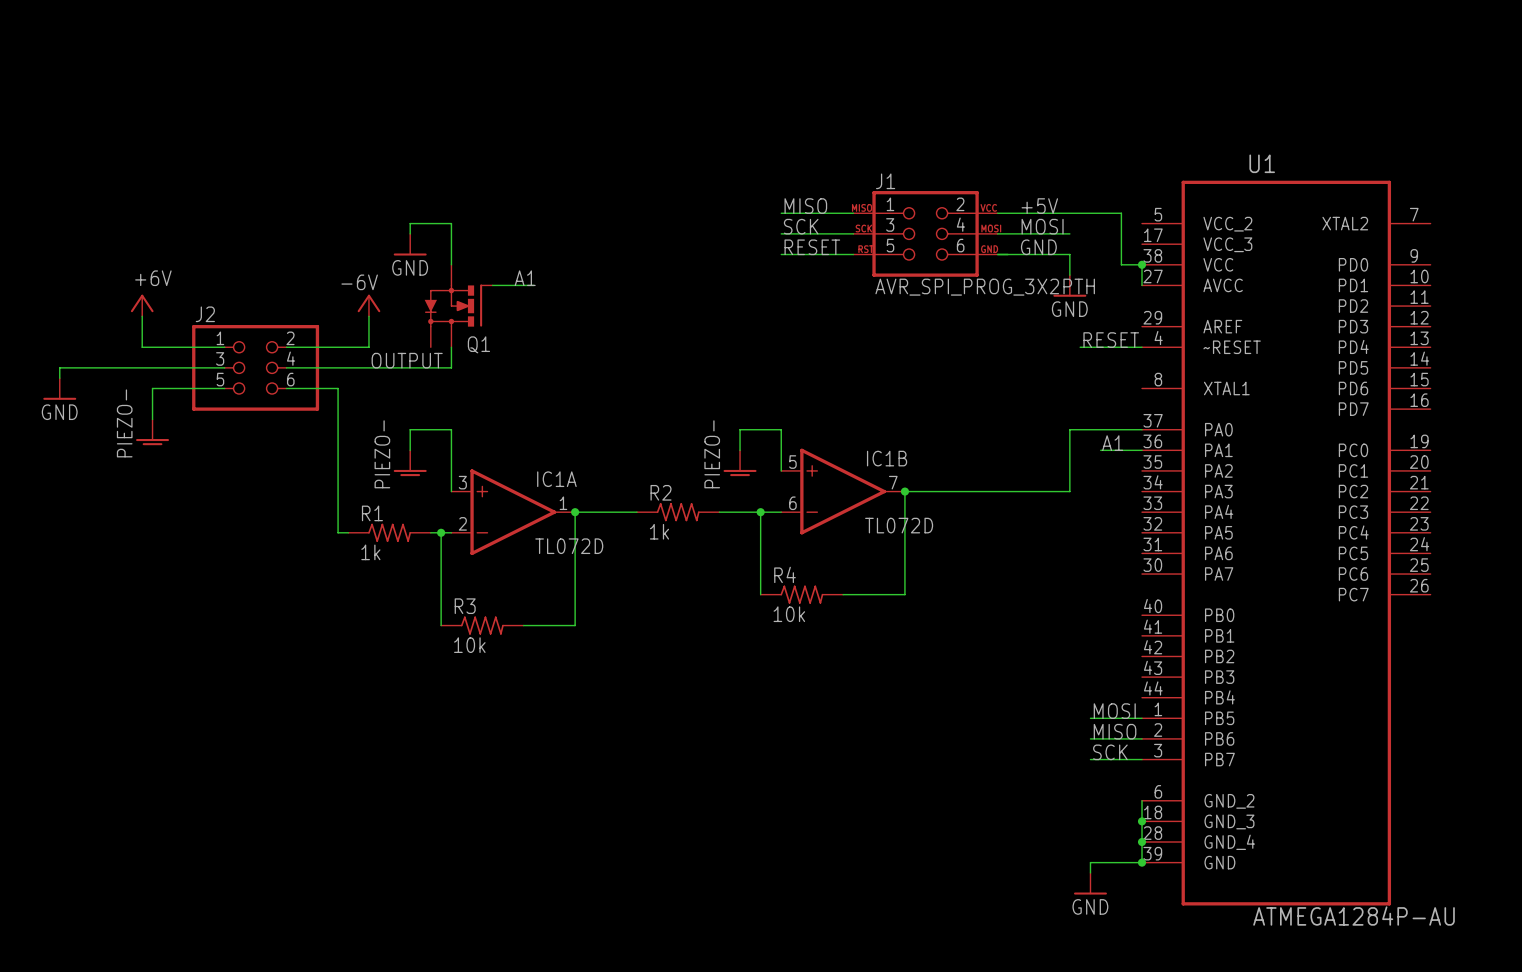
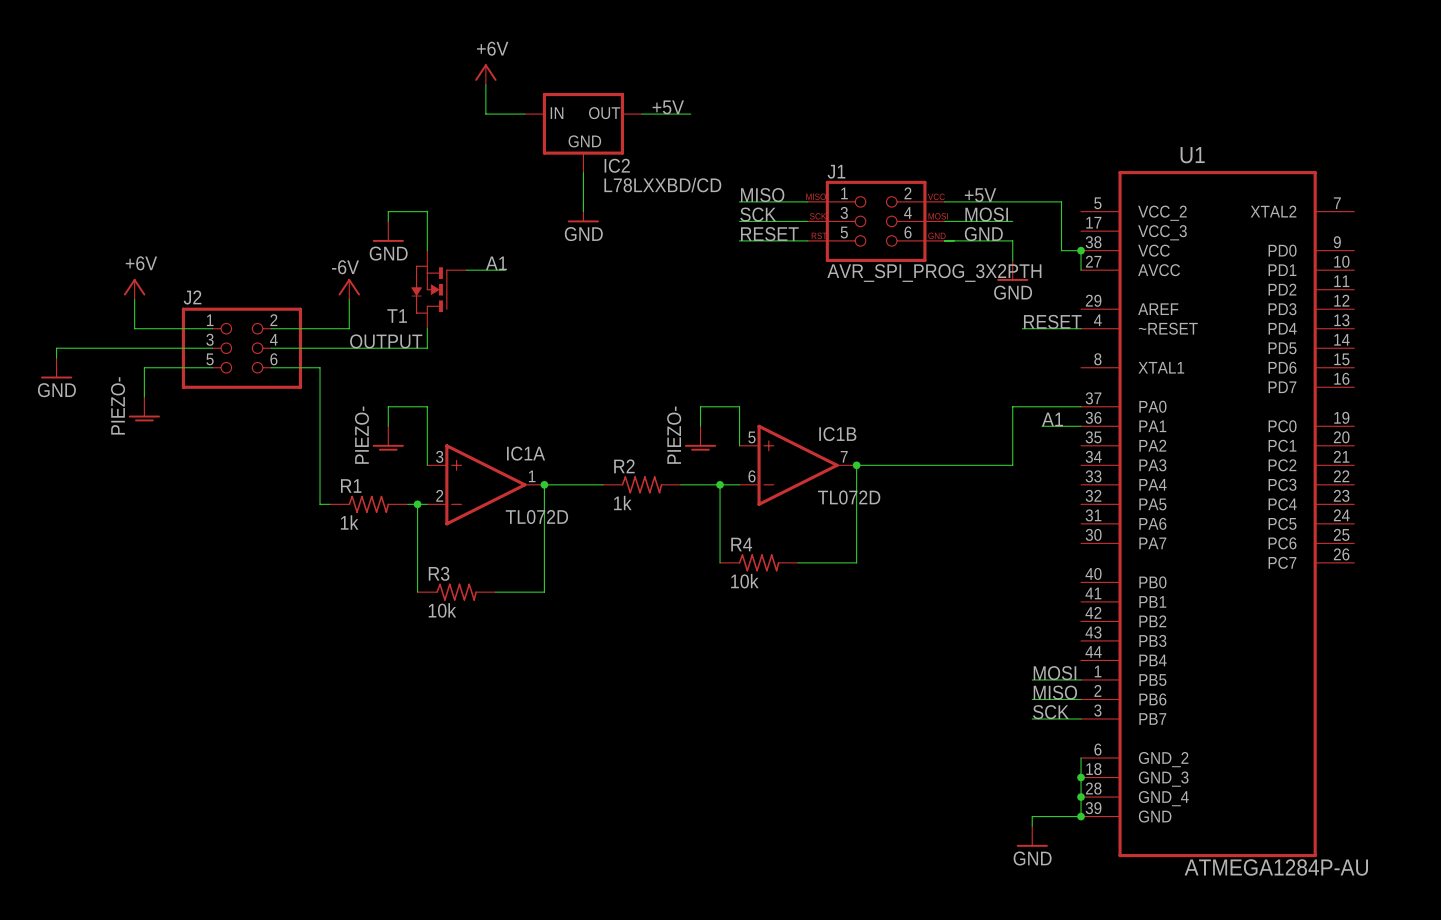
power symbol: none -> +6V (485, 74)
wire: none -> (485, 84) (485, 114) (524, 114)
label: none -> +5V (668, 107)
wire: none -> (641, 114) (690, 114)
IC2: none -> L78LXXBD/CD (583, 132)
wire: none -> (583, 172) (583, 211)
power symbol: none -> GND (583, 212)
Q1: (458, 306) -> none
T1: none -> (438, 289)

